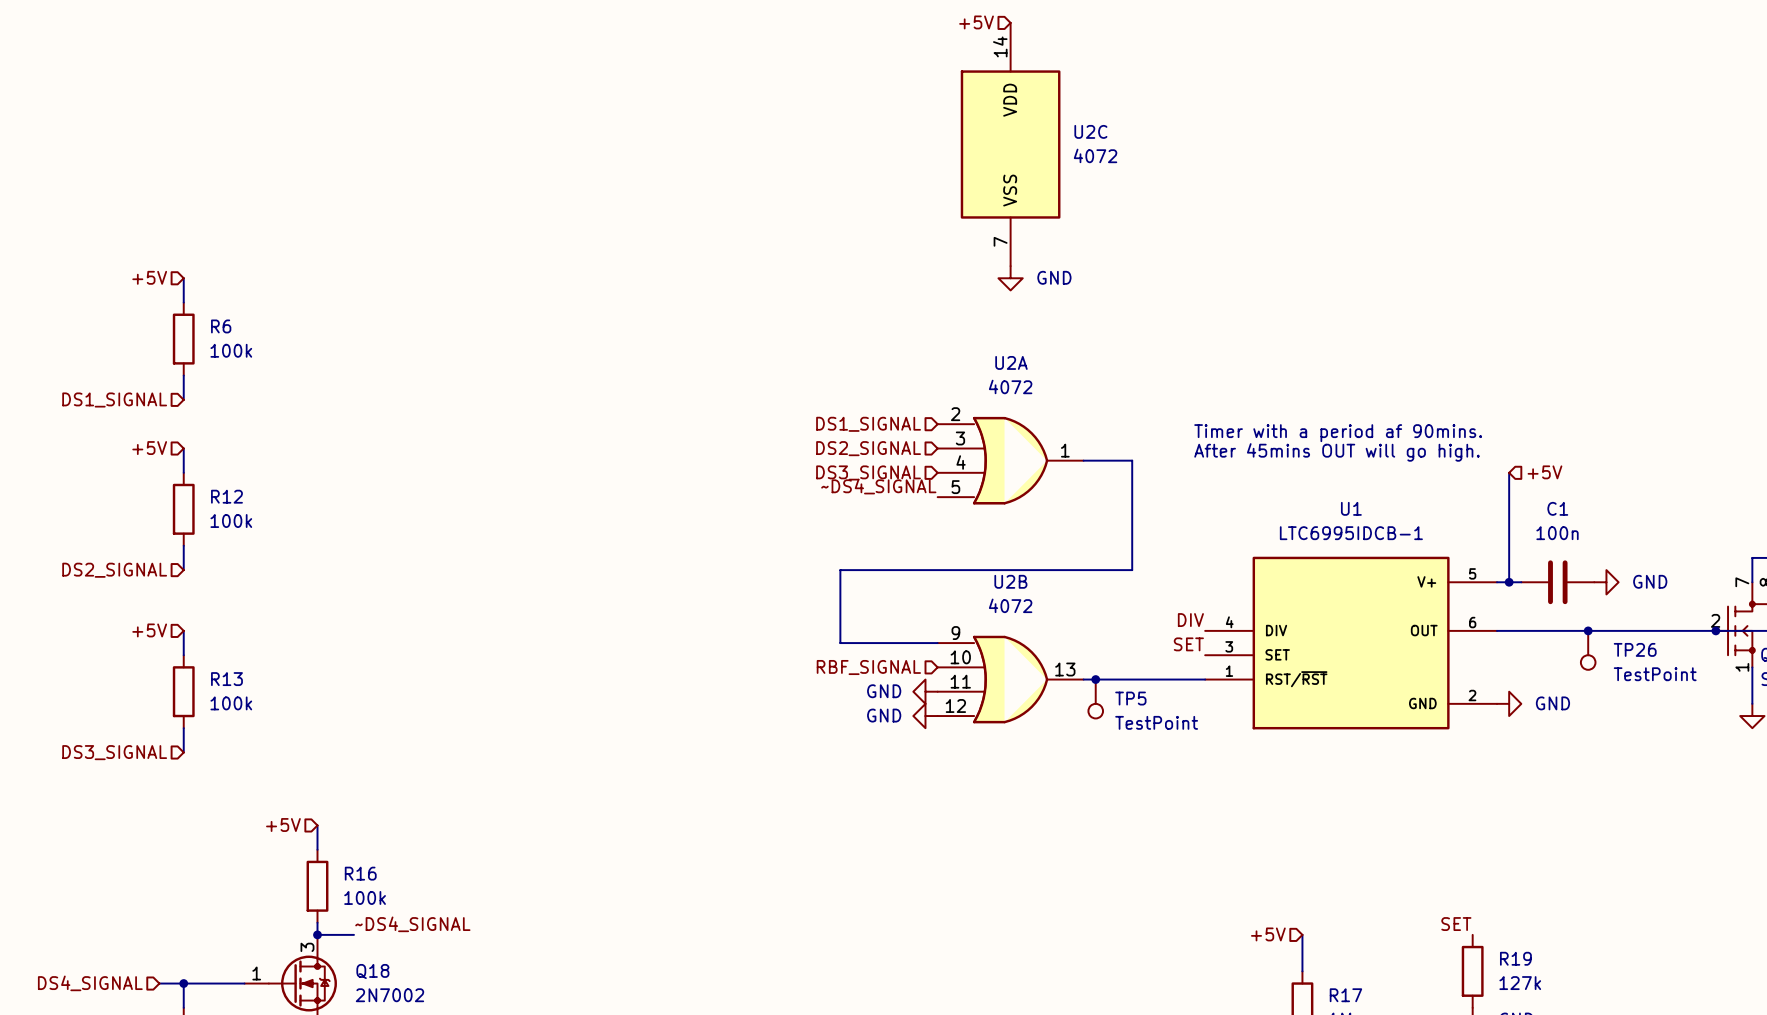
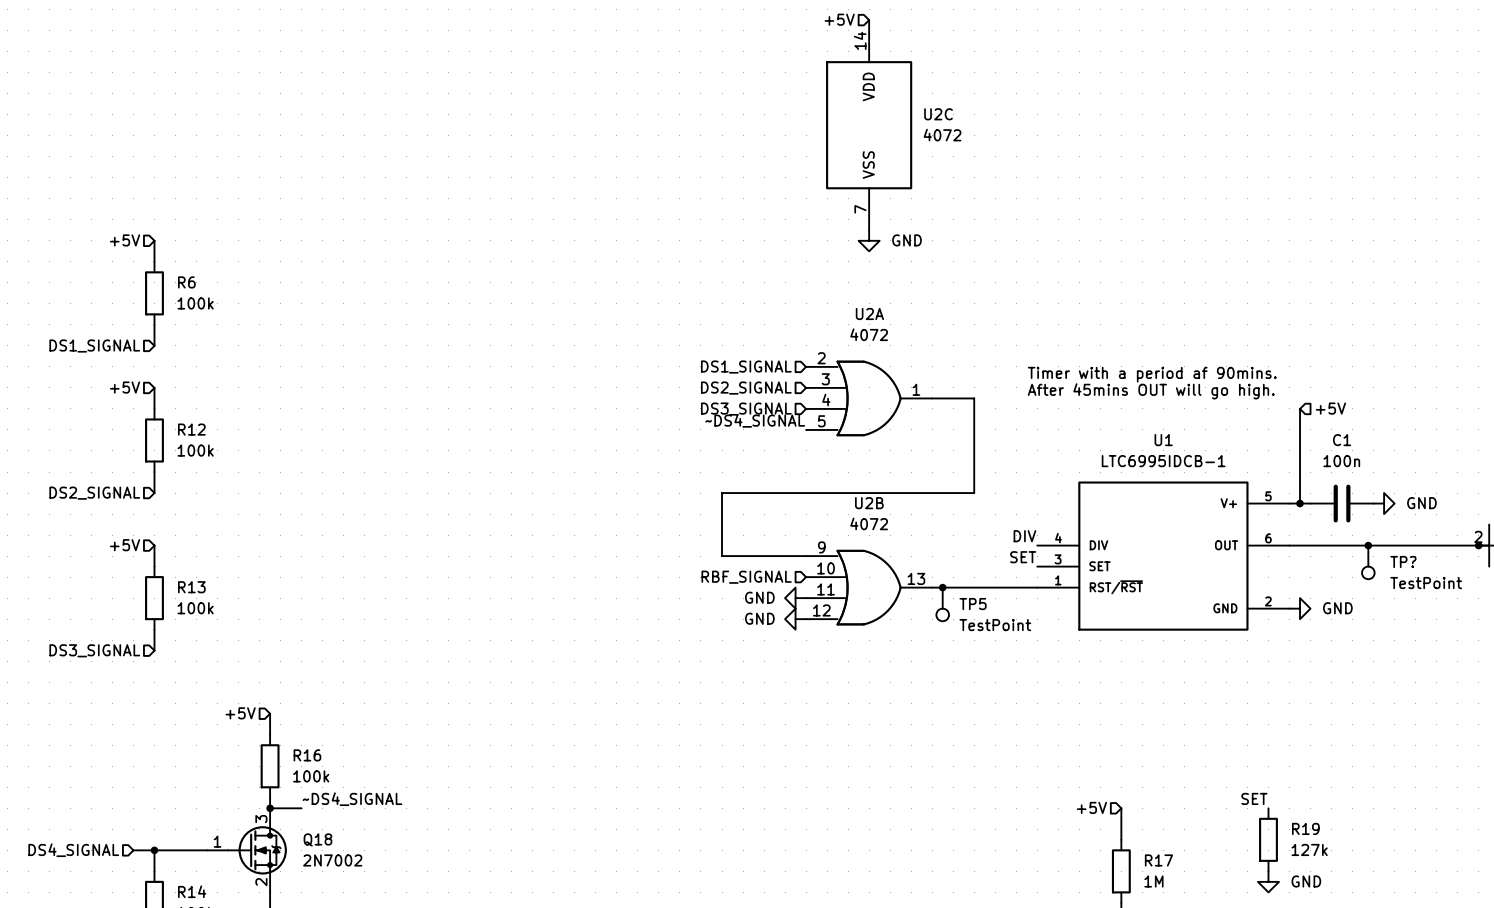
TP26 name: TP26 (1635, 649) -> TP? (1403, 562)

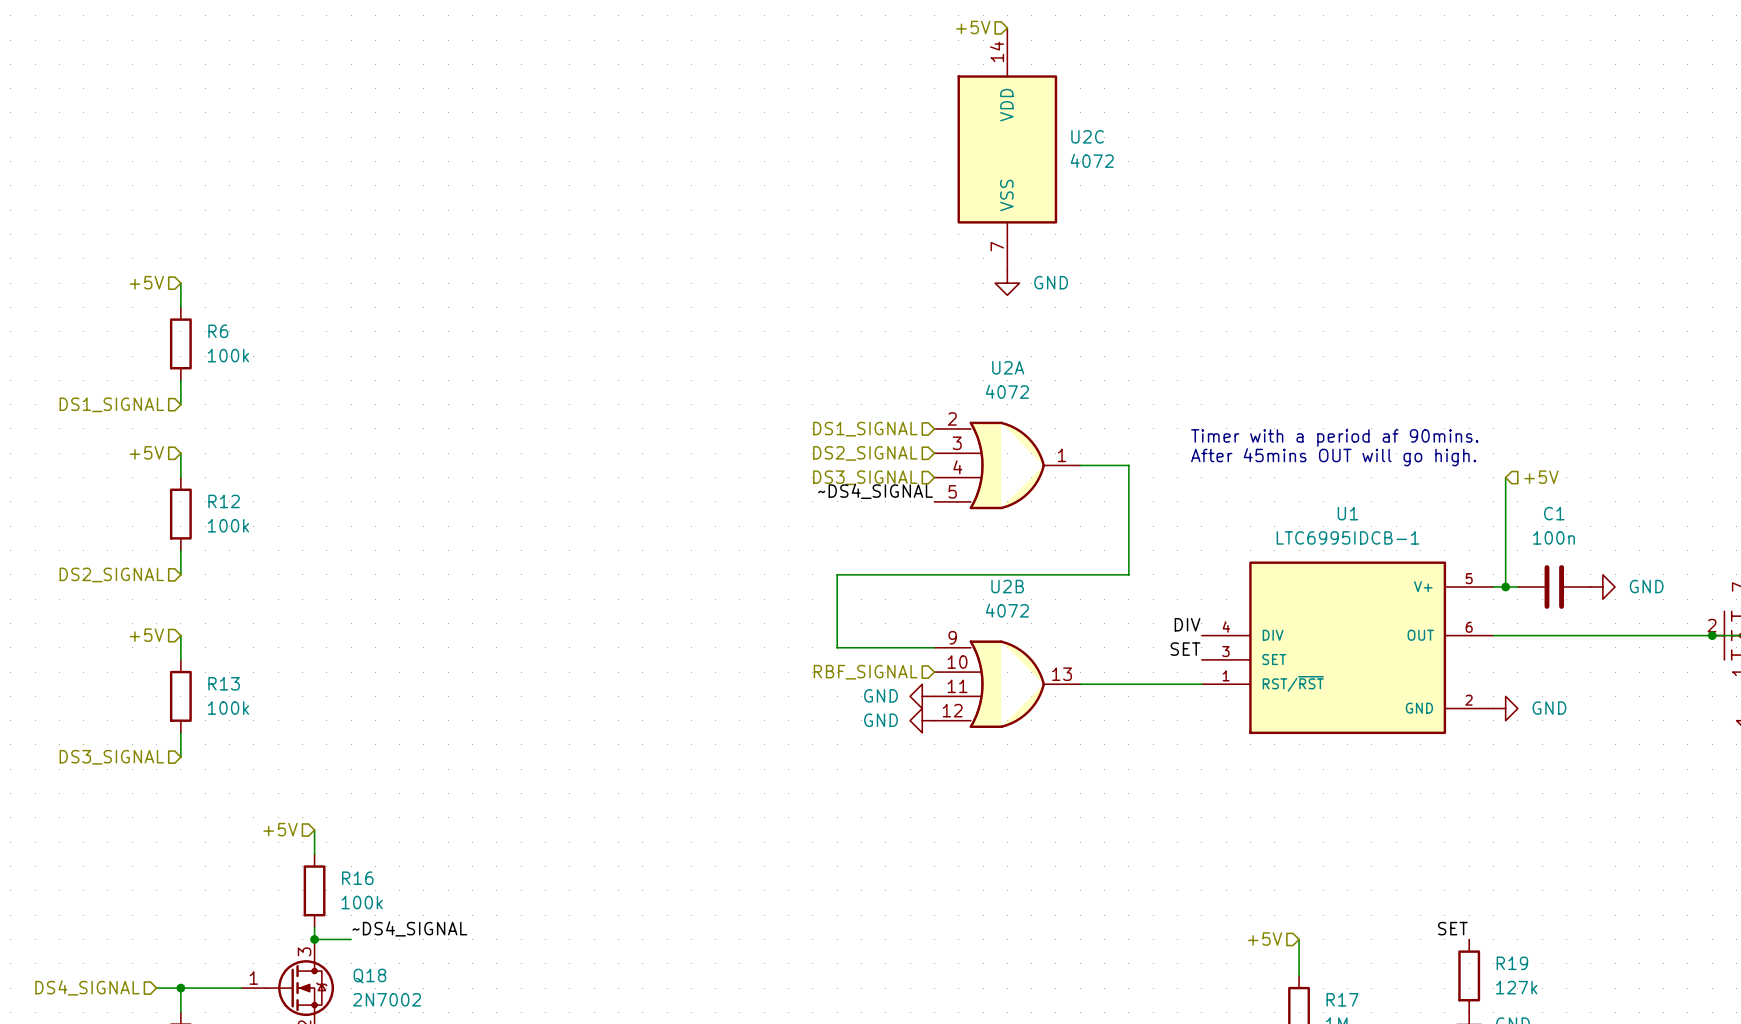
junction: (1368, 545) -> none
TP?: TestPoint (1368, 562) -> none
junction: (942, 587) -> none
TP5: TestPoint (942, 604) -> none

